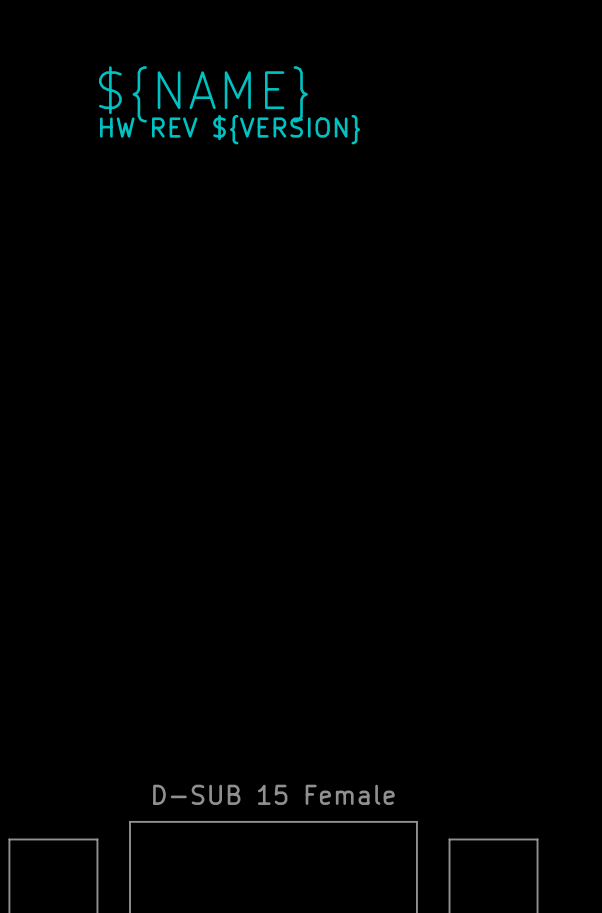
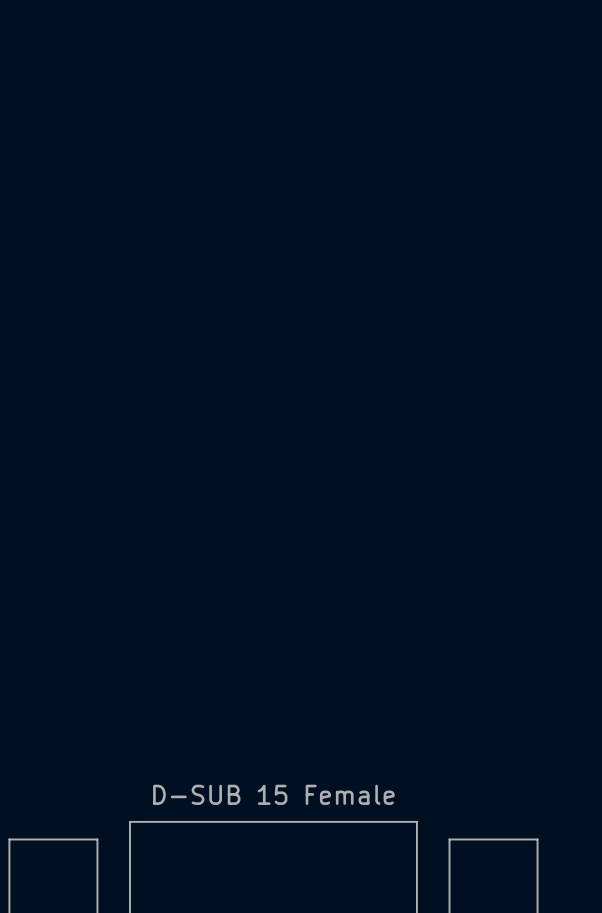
text: ${NAME} (203, 94) -> none
text: HW REV ${VERSION} (230, 129) -> none

